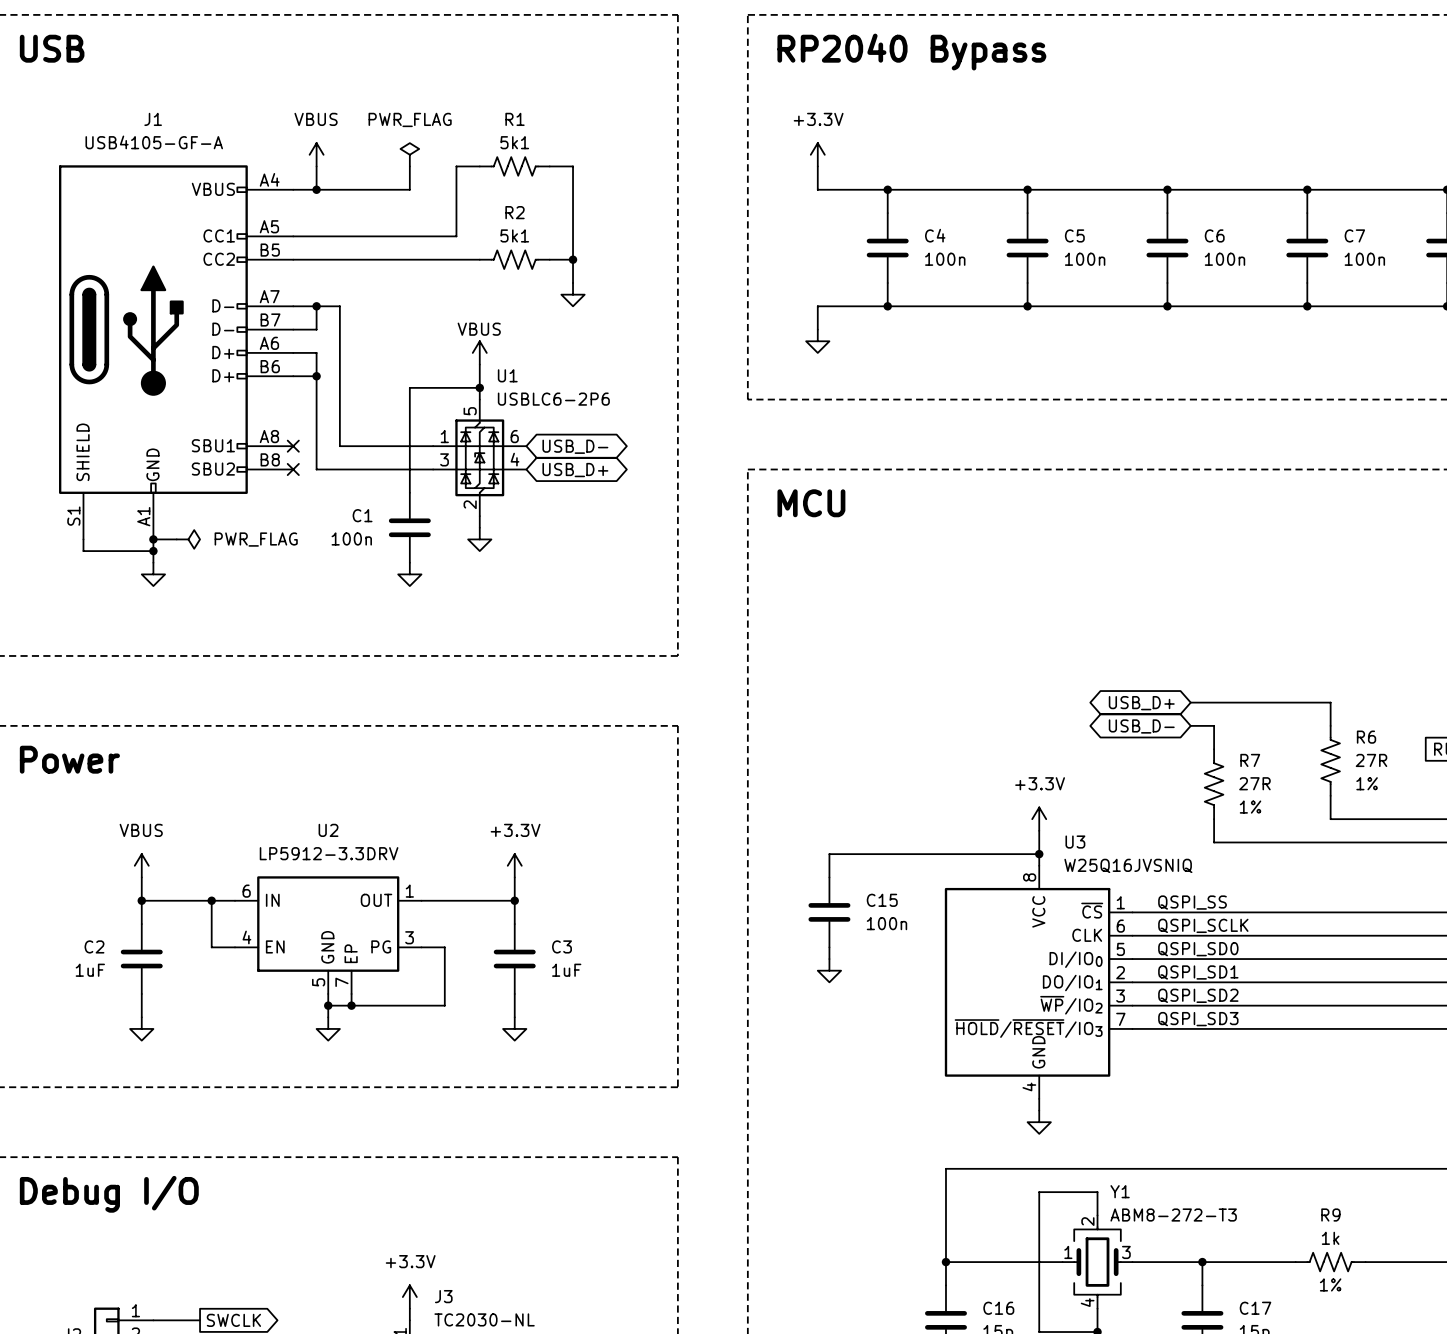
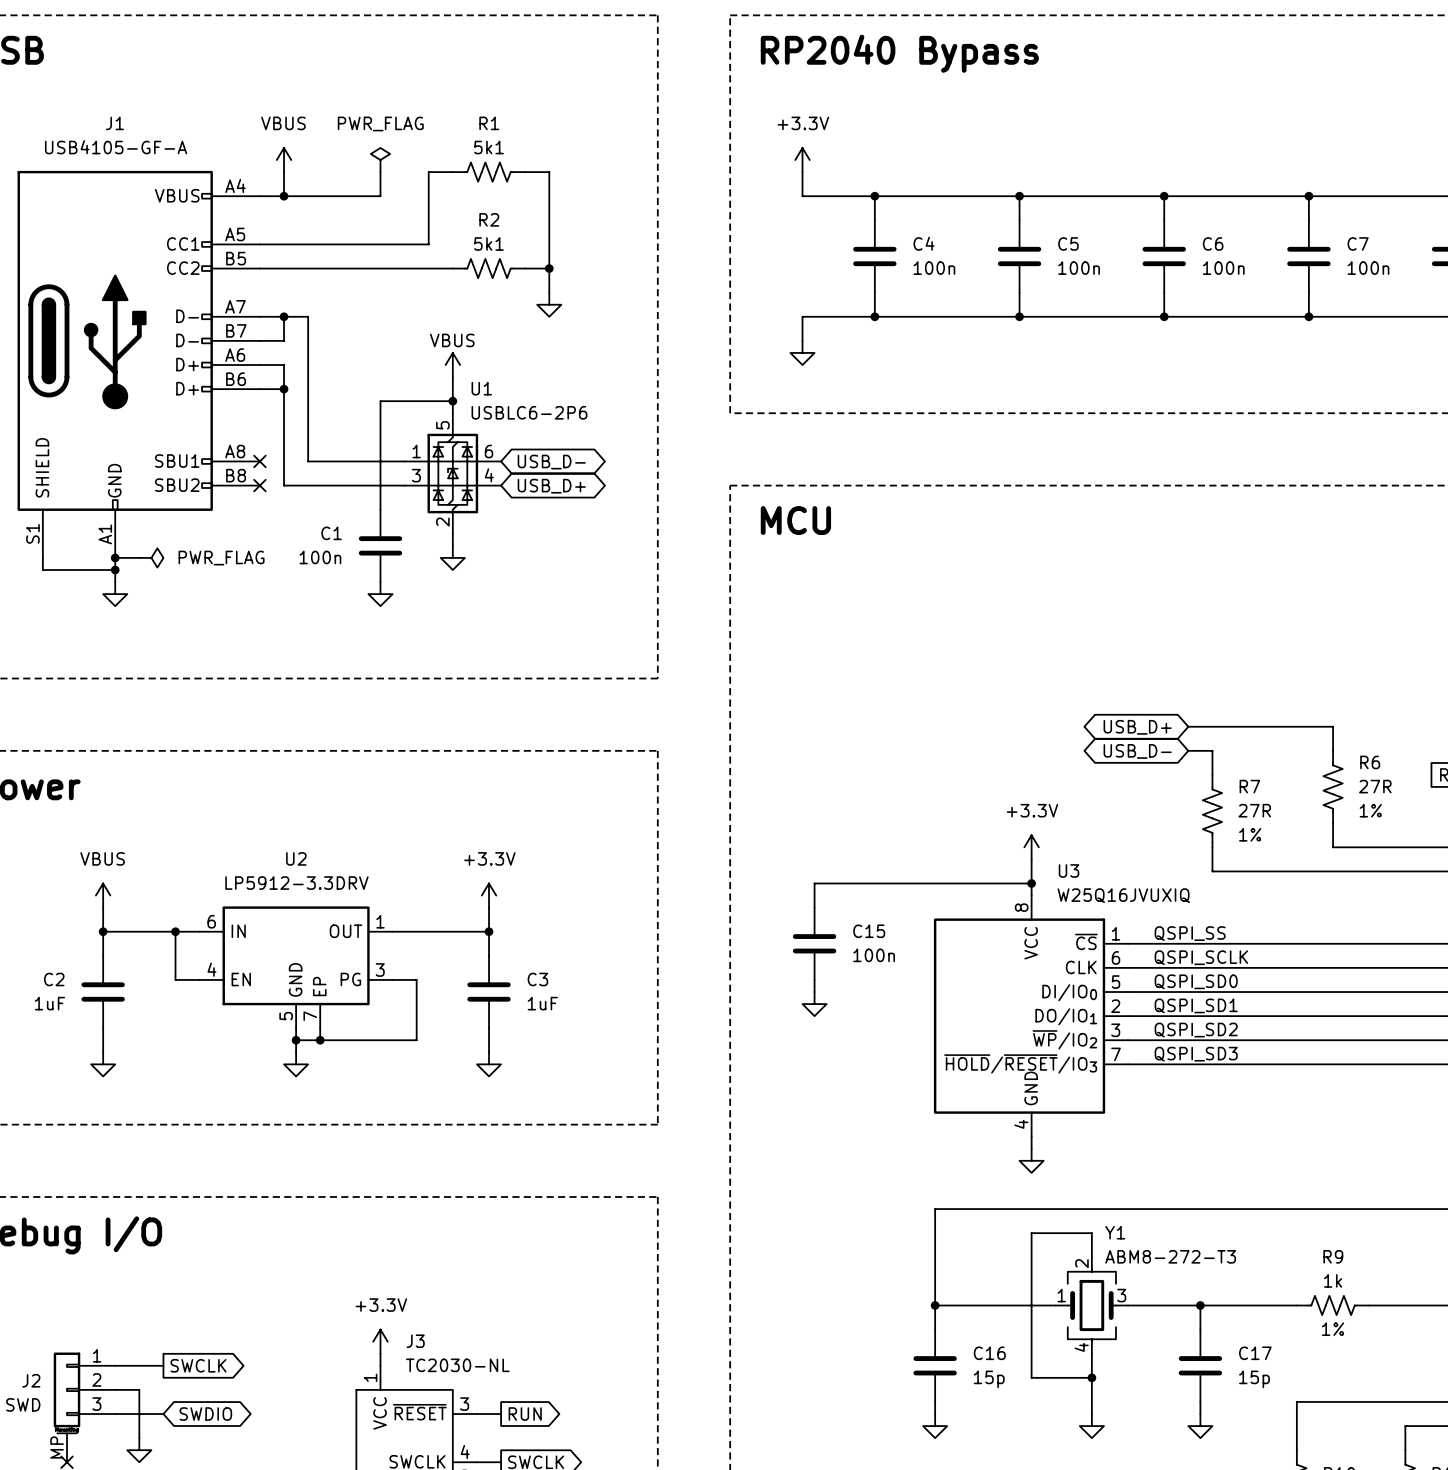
U3 value: W25Q16JVSNIQ (1128, 865) -> W25Q16JVUXIQ (1123, 895)

